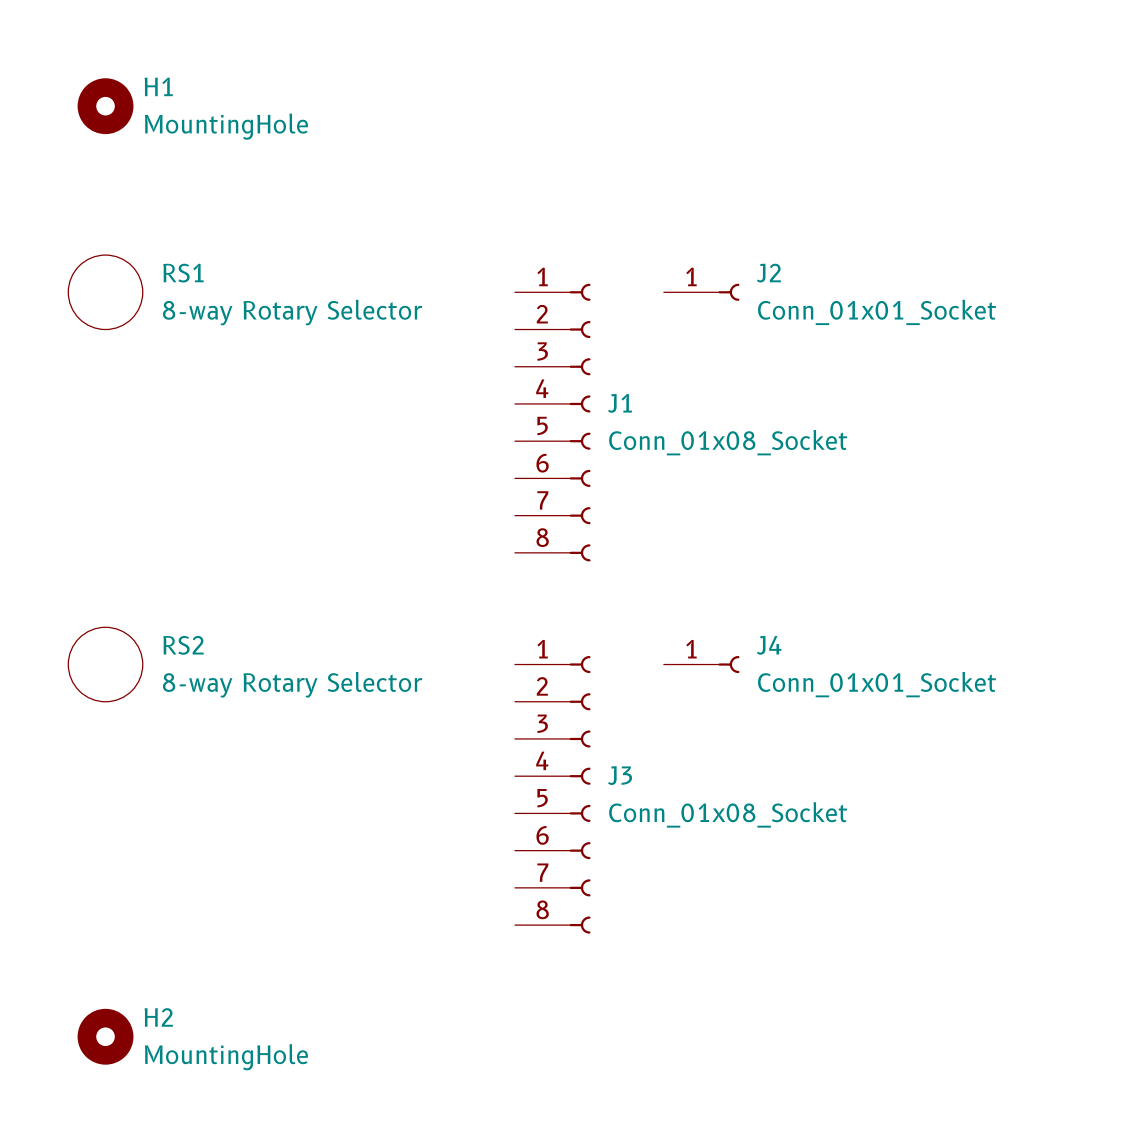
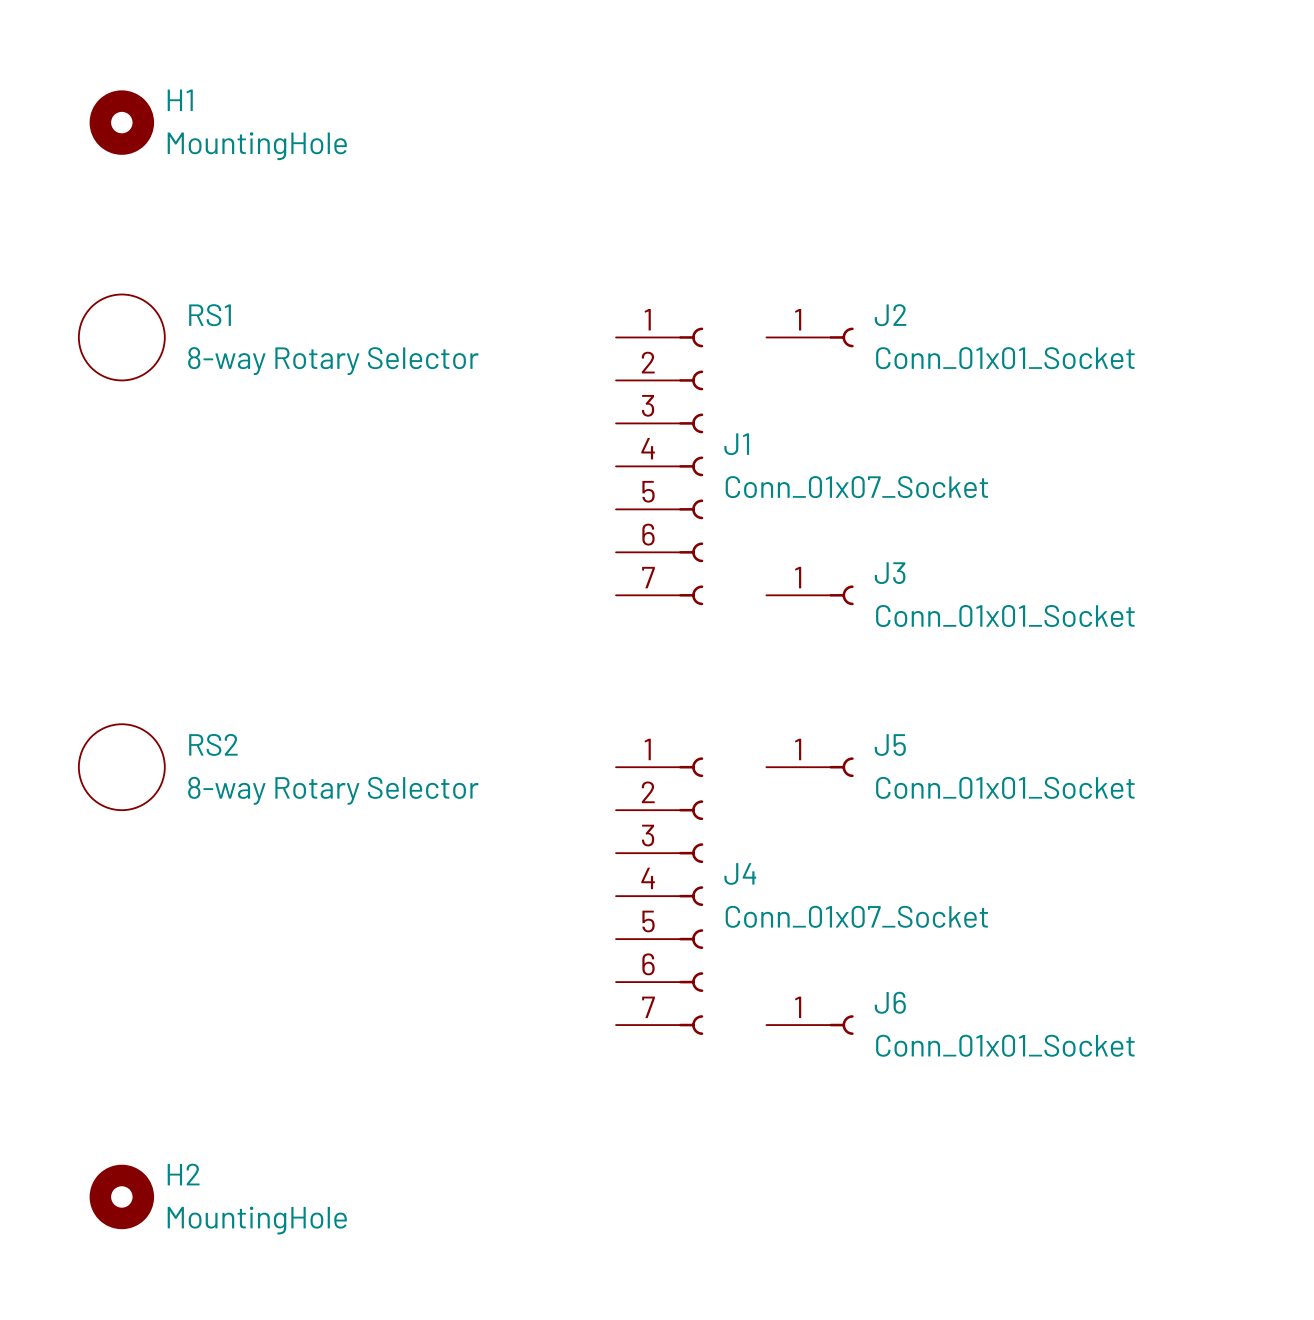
J1 symbol: [514, 283, 591, 562] -> [616, 327, 704, 606]
J1 value: Conn_01x08_Socket (728, 442) -> Conn_01x07_Socket (856, 487)
J4 name: J4 (769, 645) -> J5 (890, 745)
J3 symbol: [514, 655, 591, 934] -> [766, 585, 854, 606]
J4: none -> Conn_01x07_Socket (659, 896)
J3 value: Conn_01x08_Socket (728, 814) -> Conn_01x01_Socket (1005, 616)
J6: none -> Conn_01x01_Socket (810, 1025)

